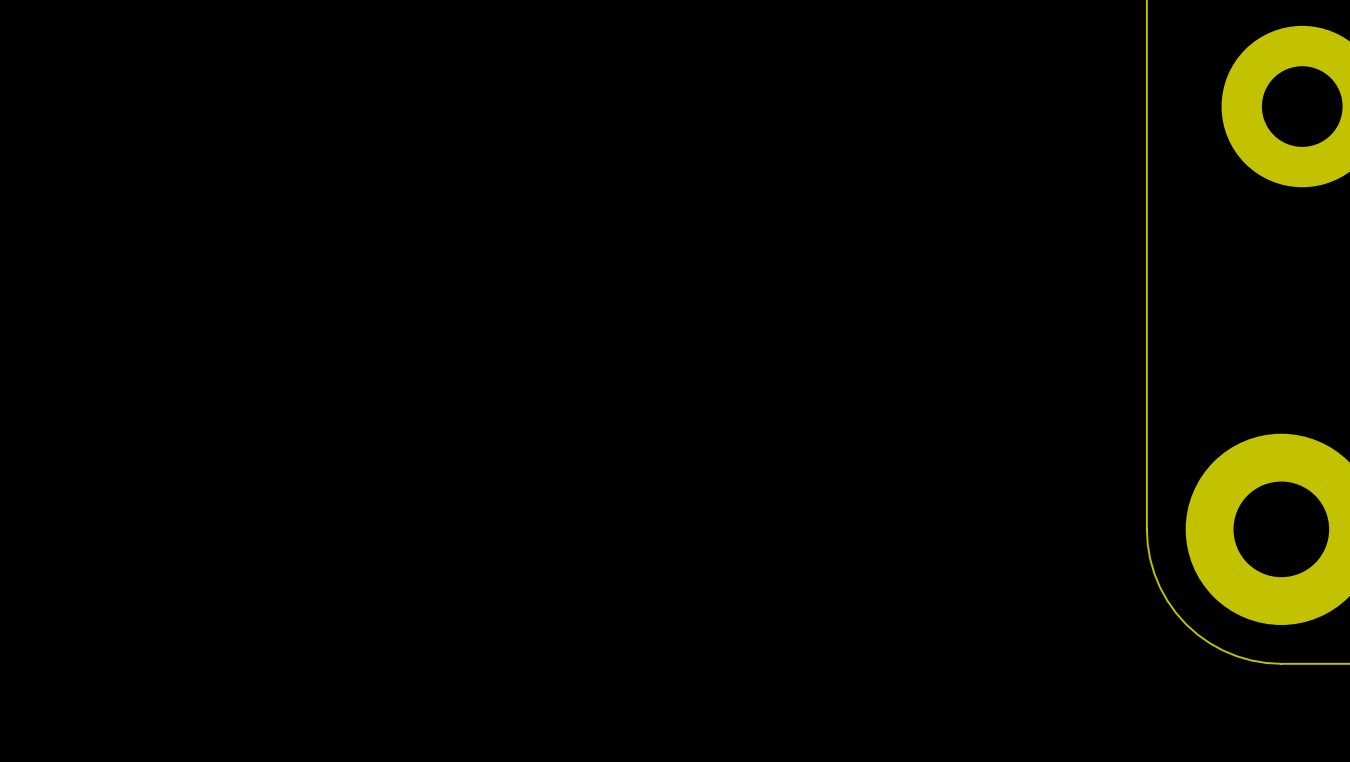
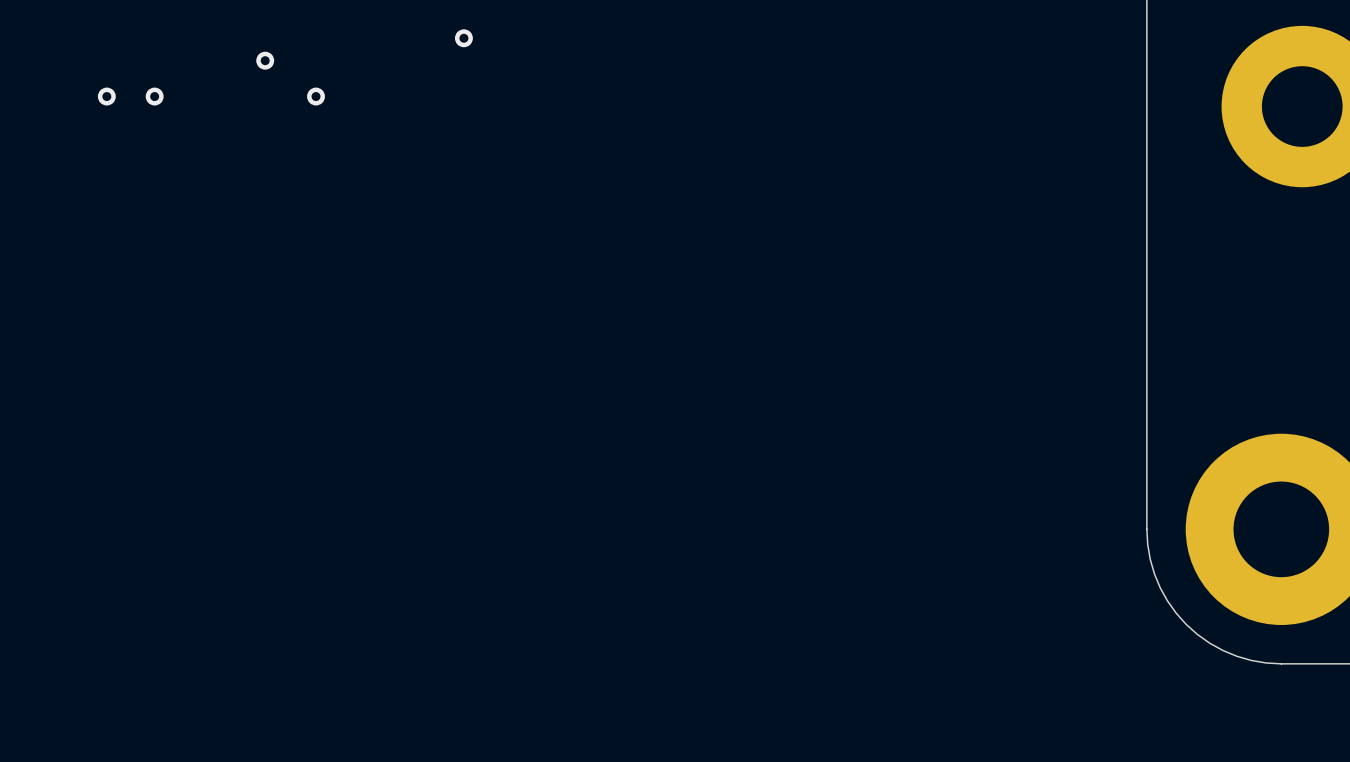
via: none -> (463, 38)
via: none -> (265, 60)
via: none -> (106, 96)
via: none -> (154, 96)
via: none -> (316, 96)

